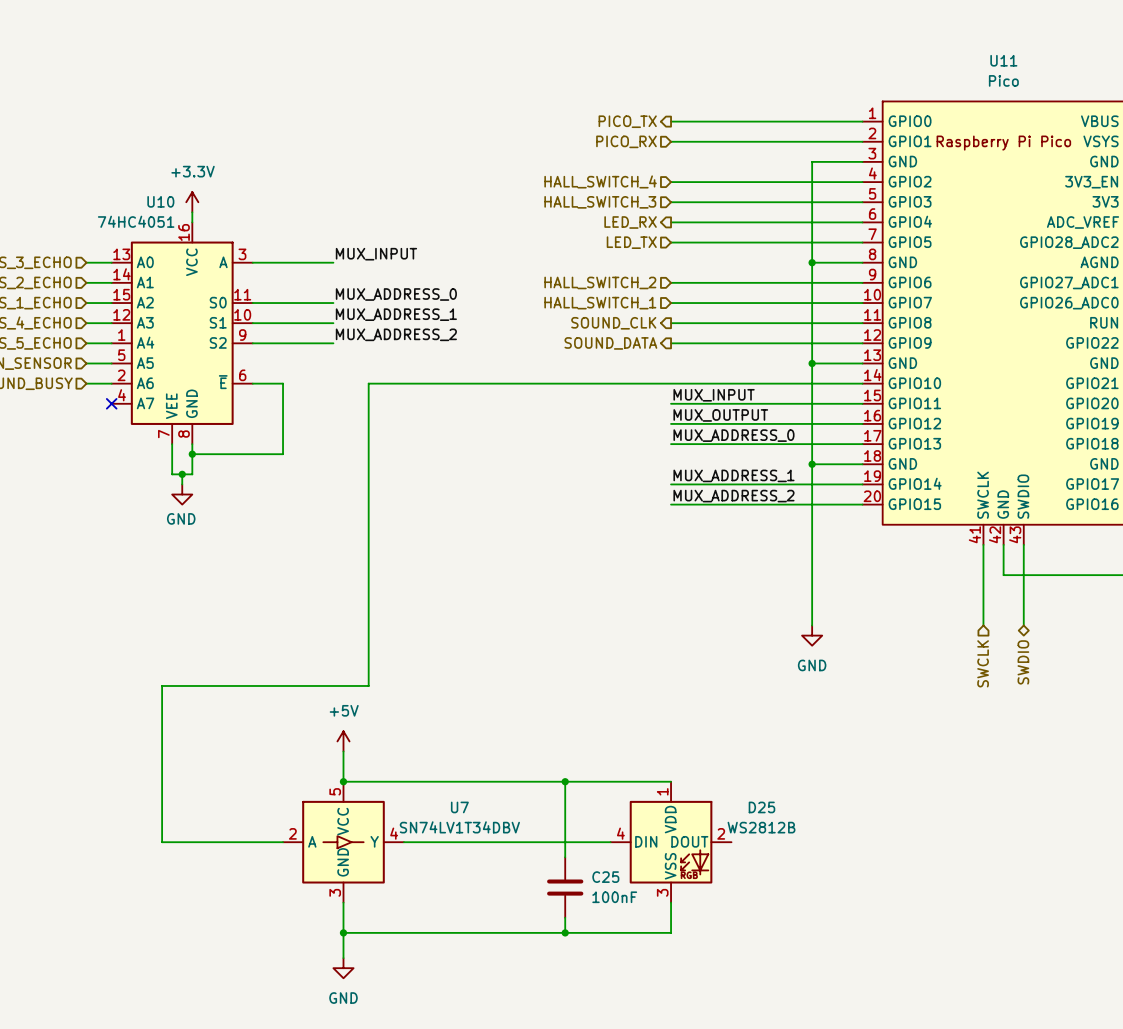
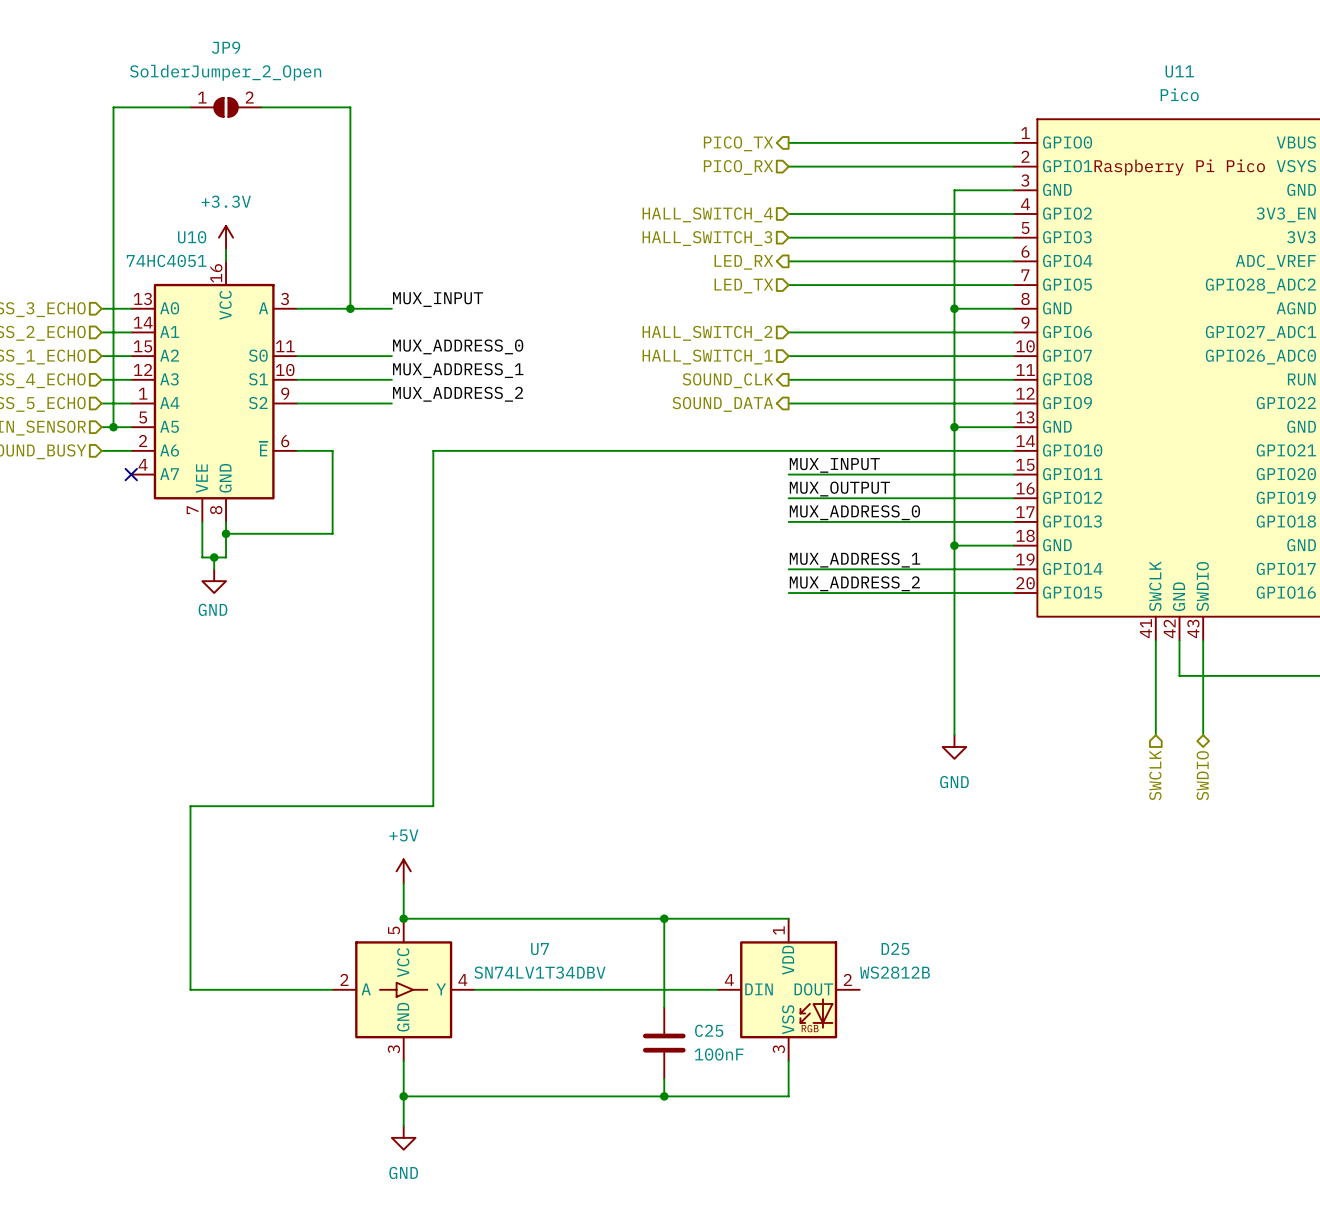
wire: none -> (190, 107) (113, 107) (113, 427)
JP9: none -> SolderJumper_2_Open (226, 107)
wire: none -> (261, 107) (350, 107) (350, 308)
junction: none -> (350, 308)
junction: none -> (113, 427)

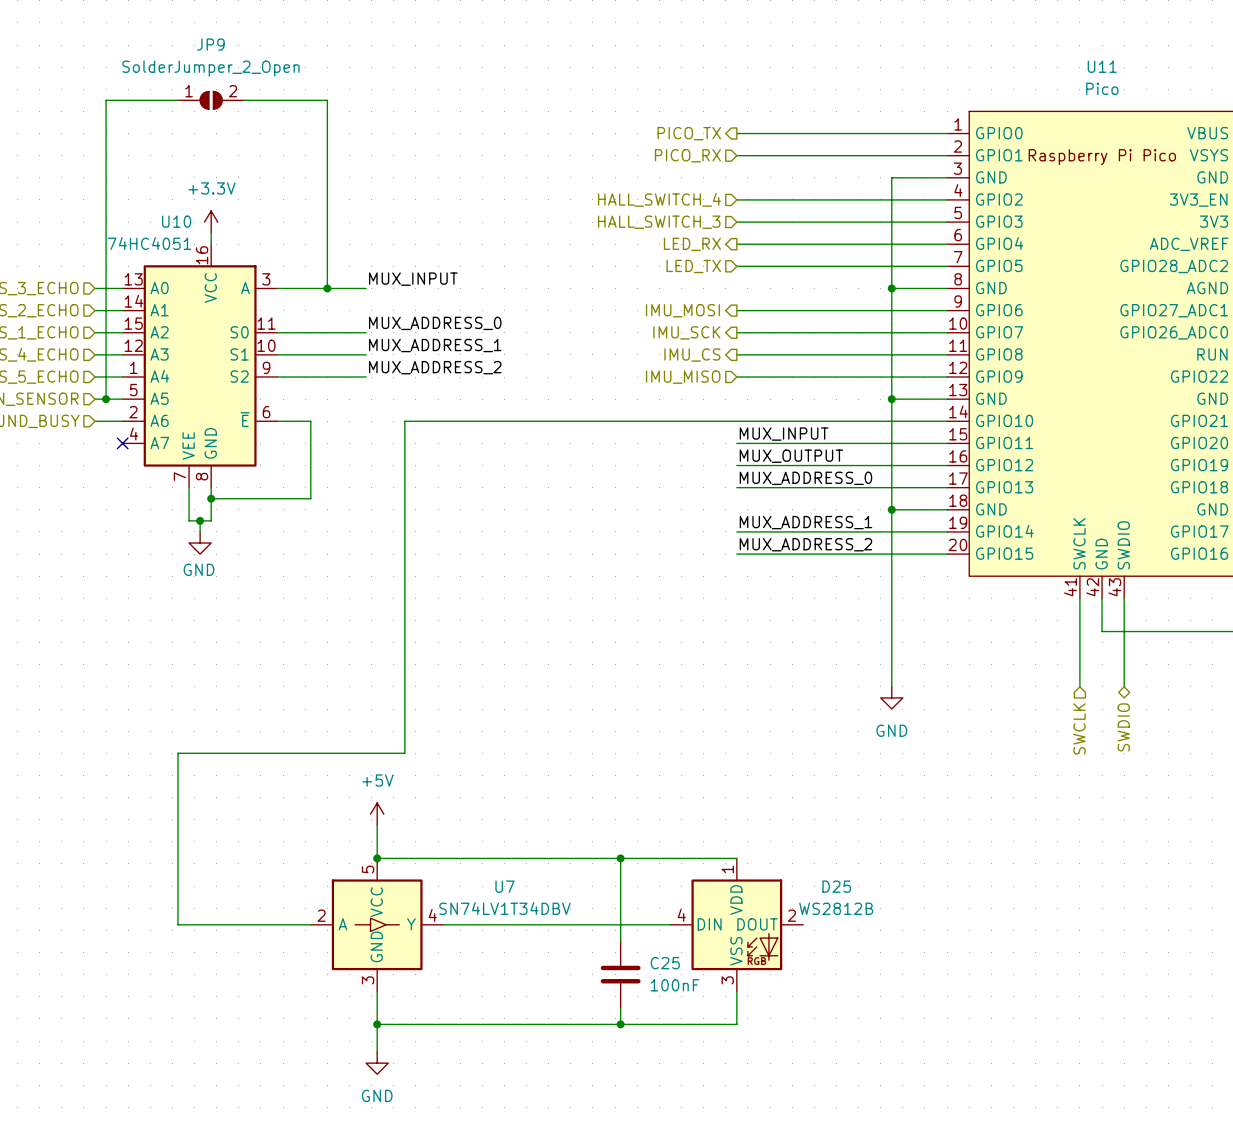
hierarchical label shape: input (707, 333) -> output (682, 310)
hierarchical label: HALL_SWITCH_2 (707, 333) -> IMU_MOSI (682, 310)
hierarchical label shape: input (707, 357) -> output (686, 332)
hierarchical label: HALL_SWITCH_1 (707, 357) -> IMU_SCK (686, 332)
hierarchical label: SOUND_CLK (727, 380) -> IMU_CS (692, 354)
hierarchical label shape: output (722, 404) -> input (683, 377)
hierarchical label: SOUND_DATA (722, 404) -> IMU_MISO (683, 377)

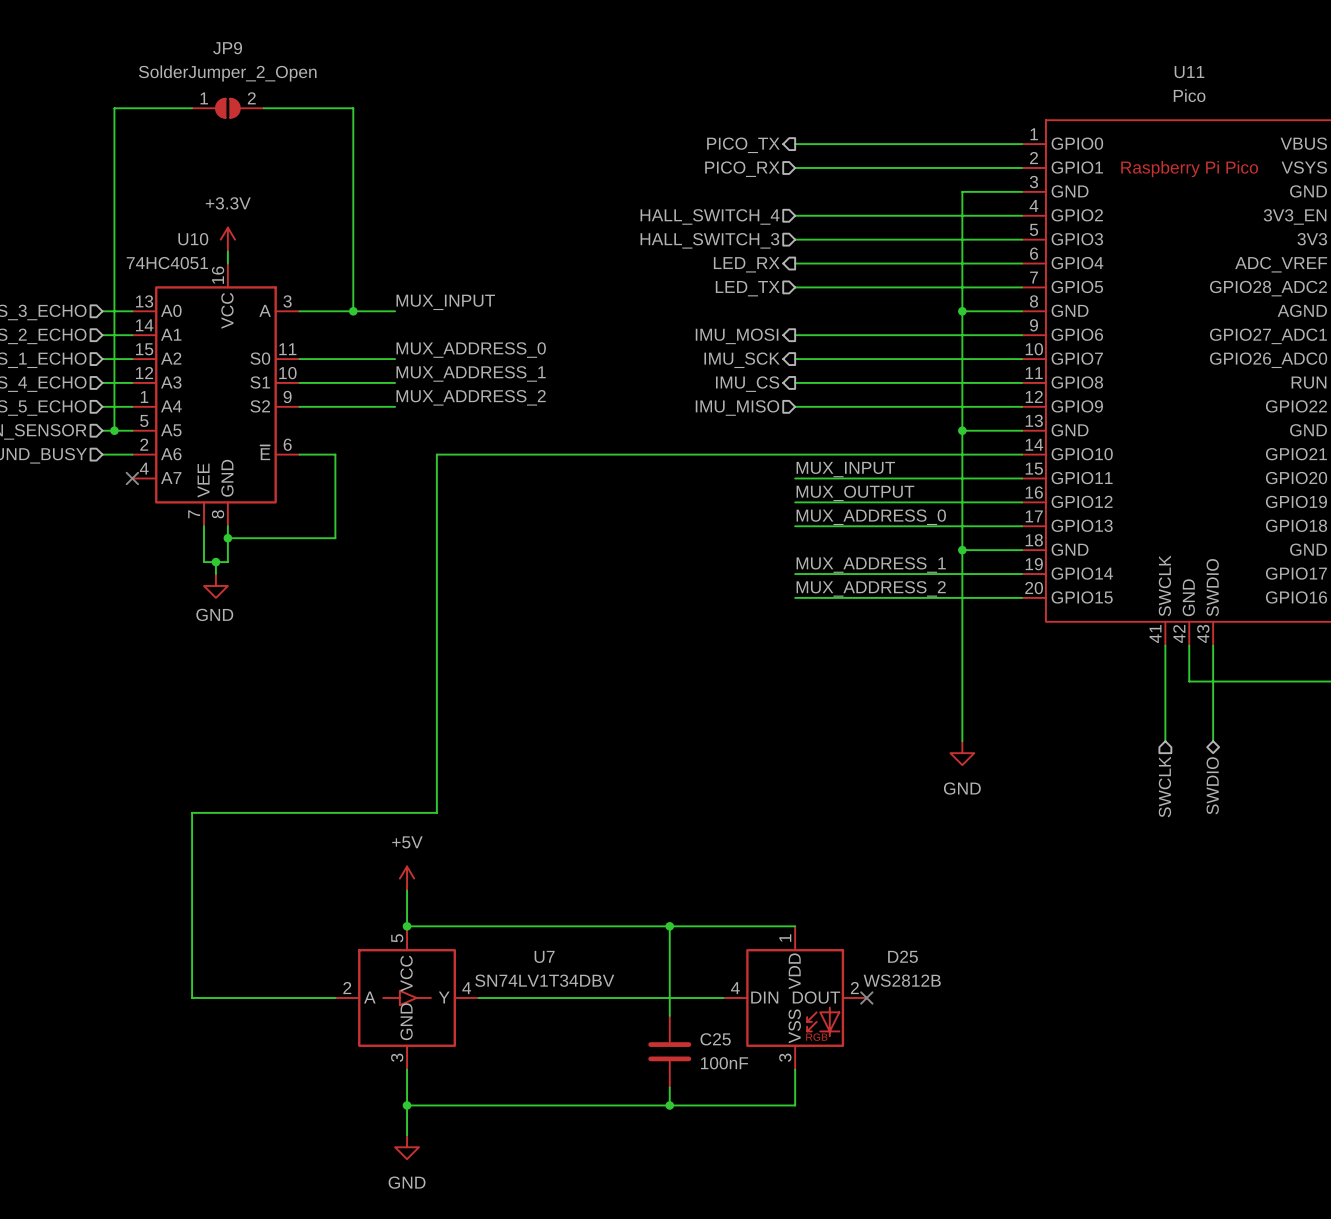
no-connect mark: none -> (866, 997)

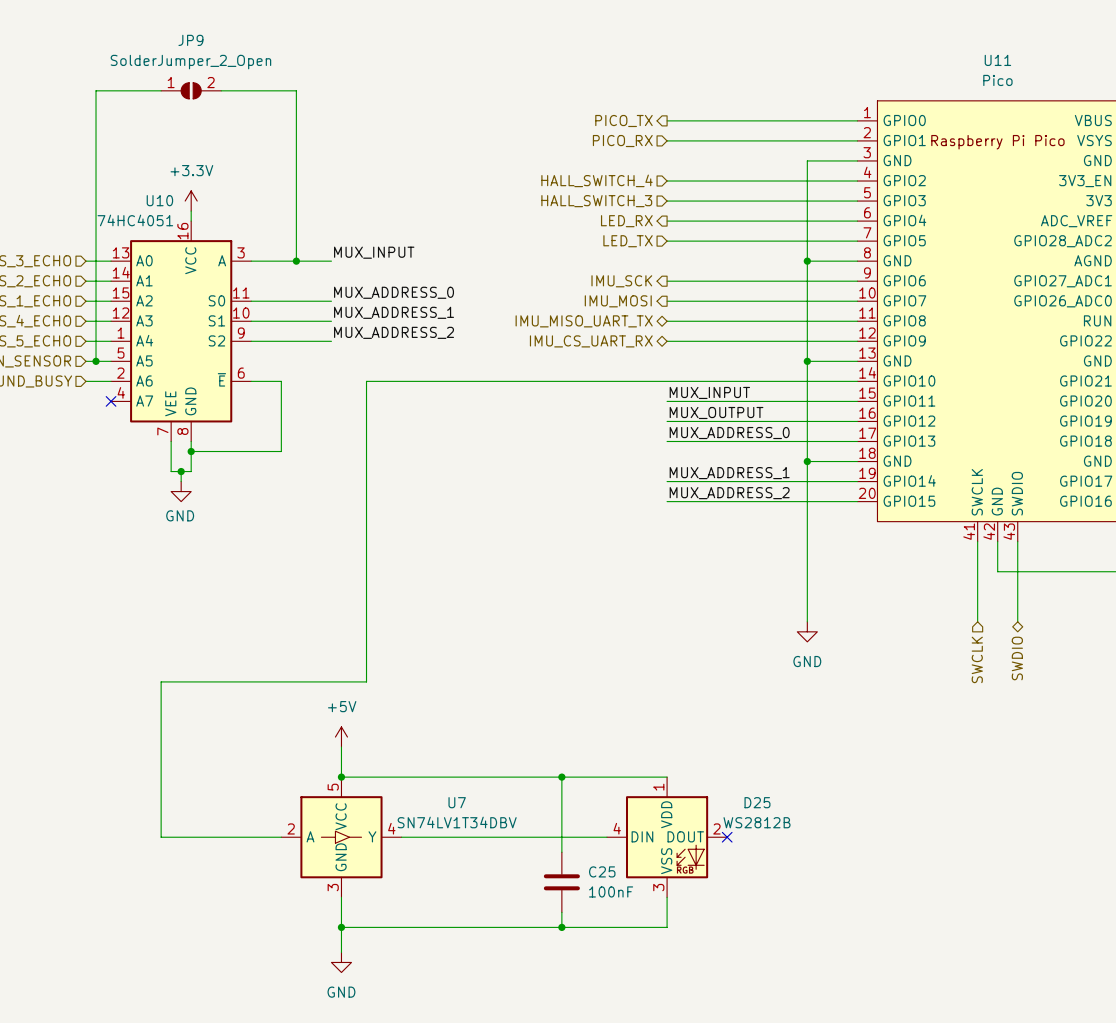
hierarchical label: IMU_MOSI (737, 336) -> IMU_SCK (621, 281)
hierarchical label: IMU_SCK (742, 360) -> IMU_MOSI (618, 301)
hierarchical label shape: output (747, 384) -> bidirectional (584, 321)
hierarchical label: IMU_CS (747, 384) -> IMU_MISO_UART_TX (584, 321)
hierarchical label shape: input (737, 408) -> bidirectional (591, 341)
hierarchical label: IMU_MISO (737, 408) -> IMU_CS_UART_RX (591, 341)

